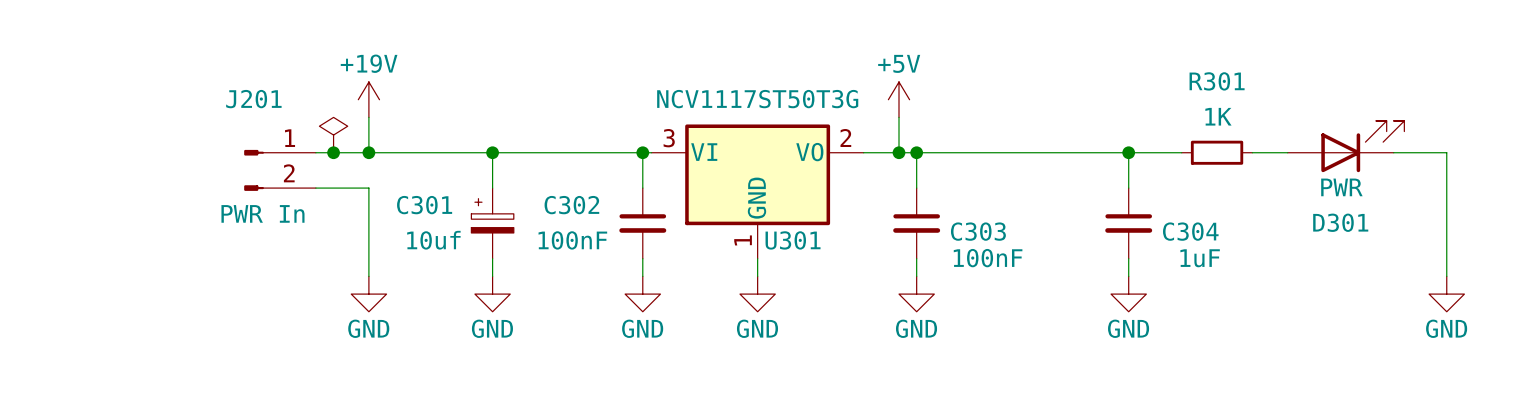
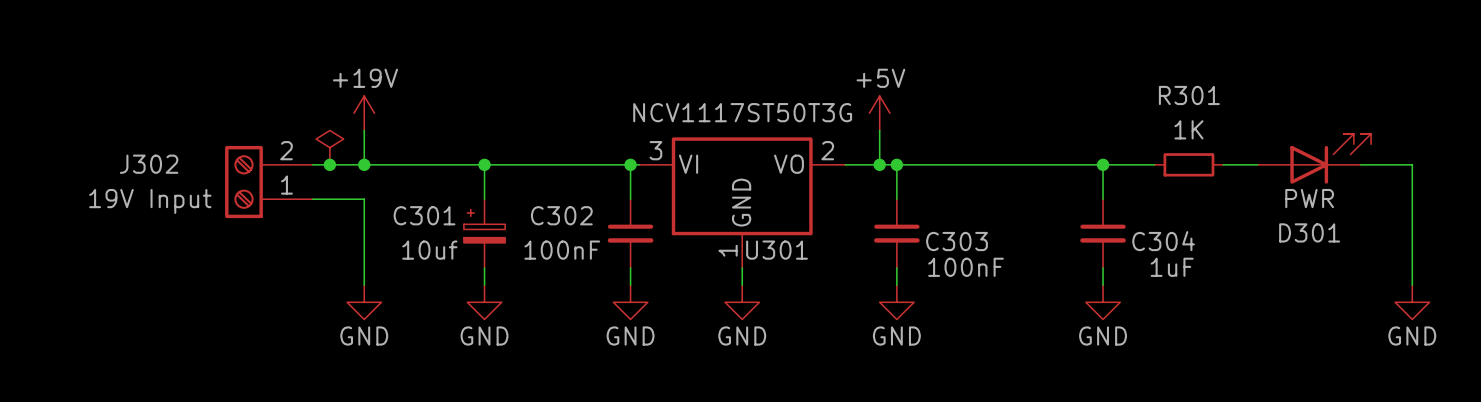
J302: none -> 19V Input (268, 182)
J201: PWR In (280, 170) -> none

